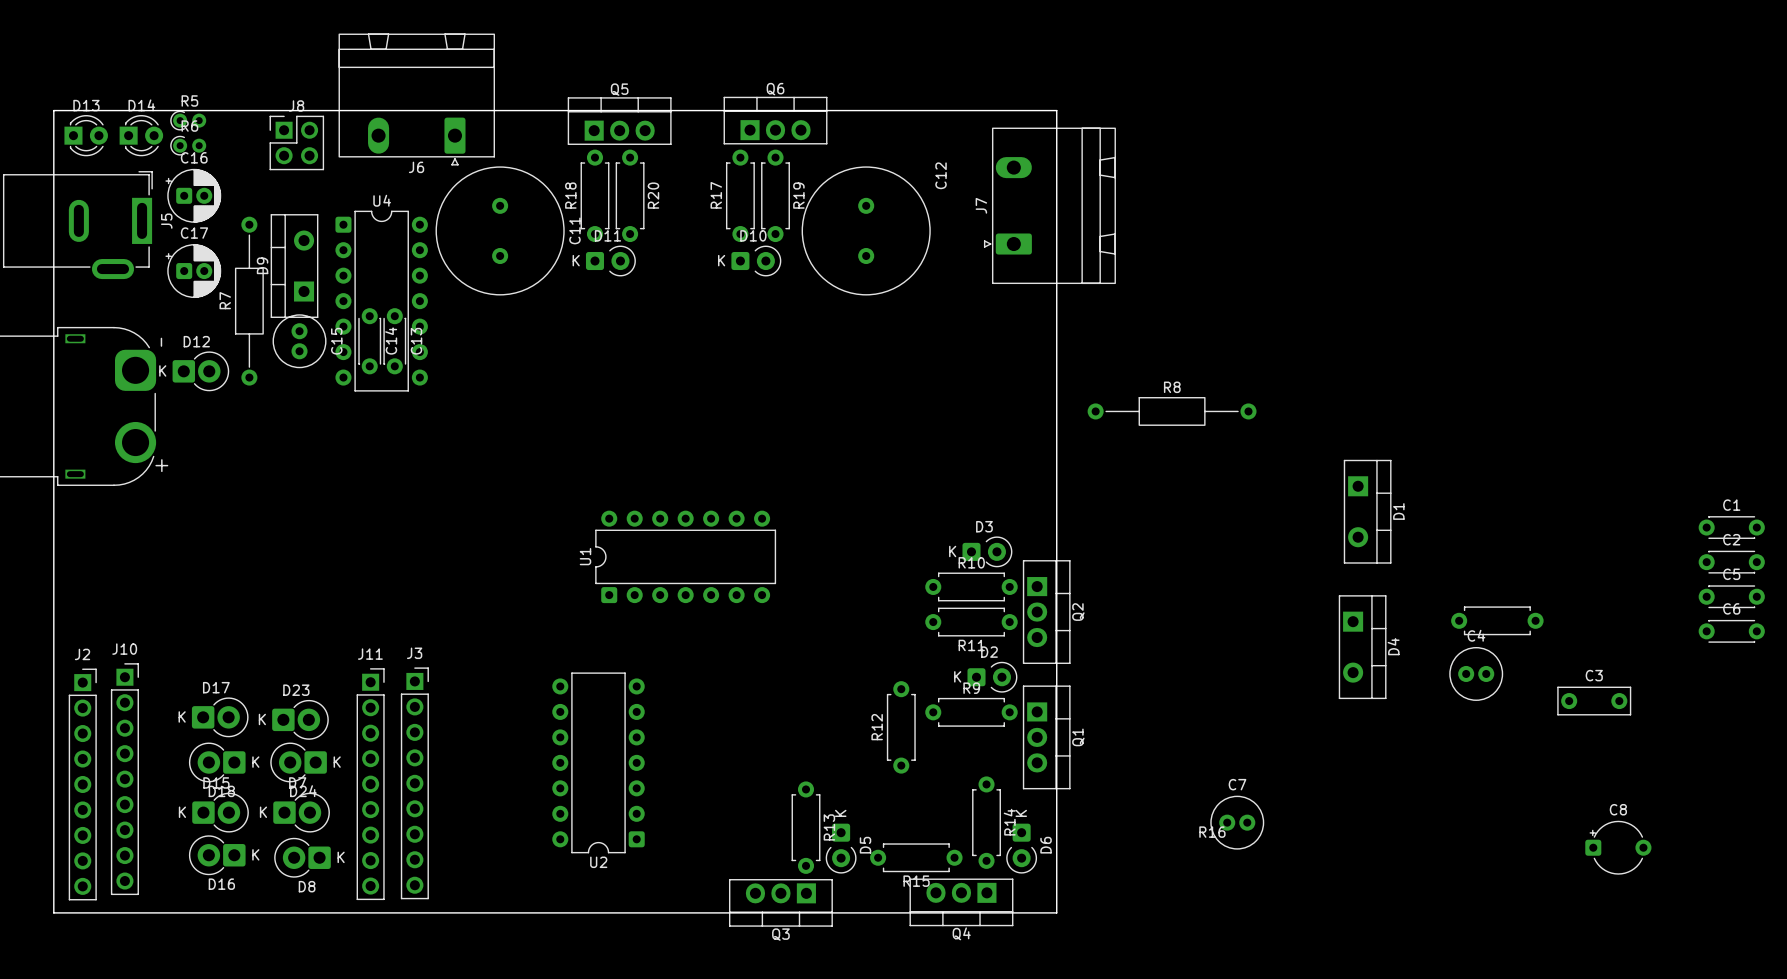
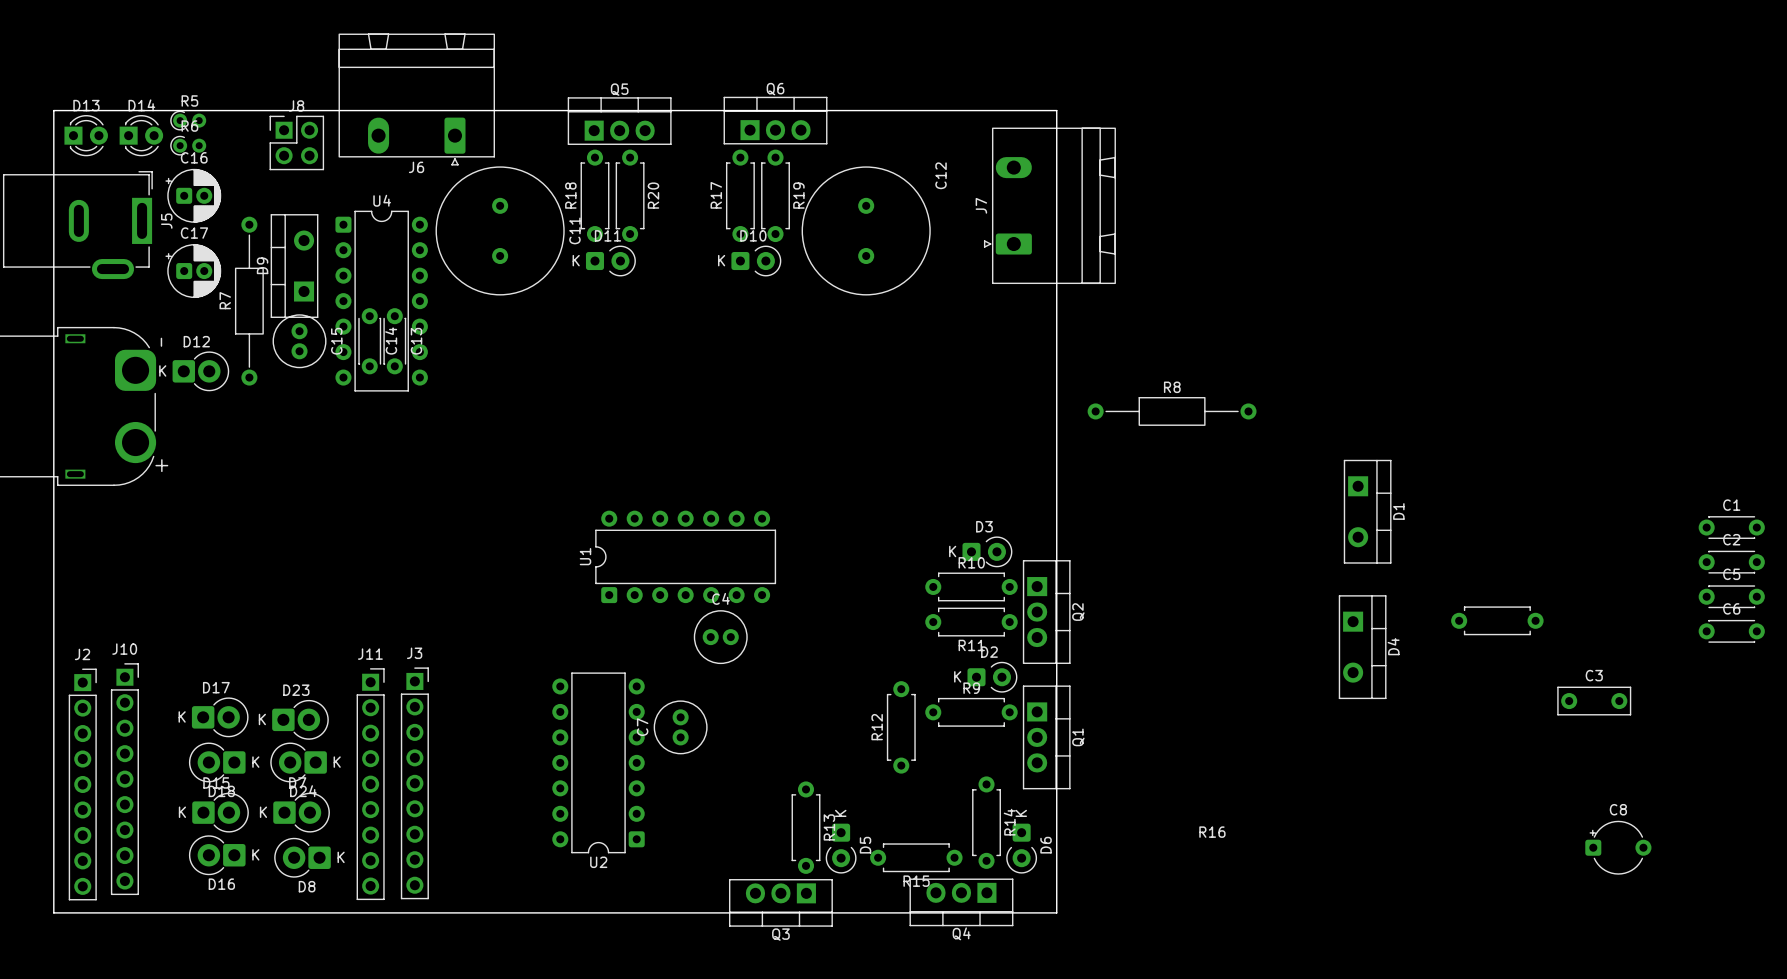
C4 position: (1476, 673) -> (720, 637)
C7 name position: C7 (1237, 784) -> C7 (642, 727)
C7 rotation: 0° (1237, 822) -> 90° clockwise (680, 727)
C7 position: (1237, 822) -> (680, 727)

